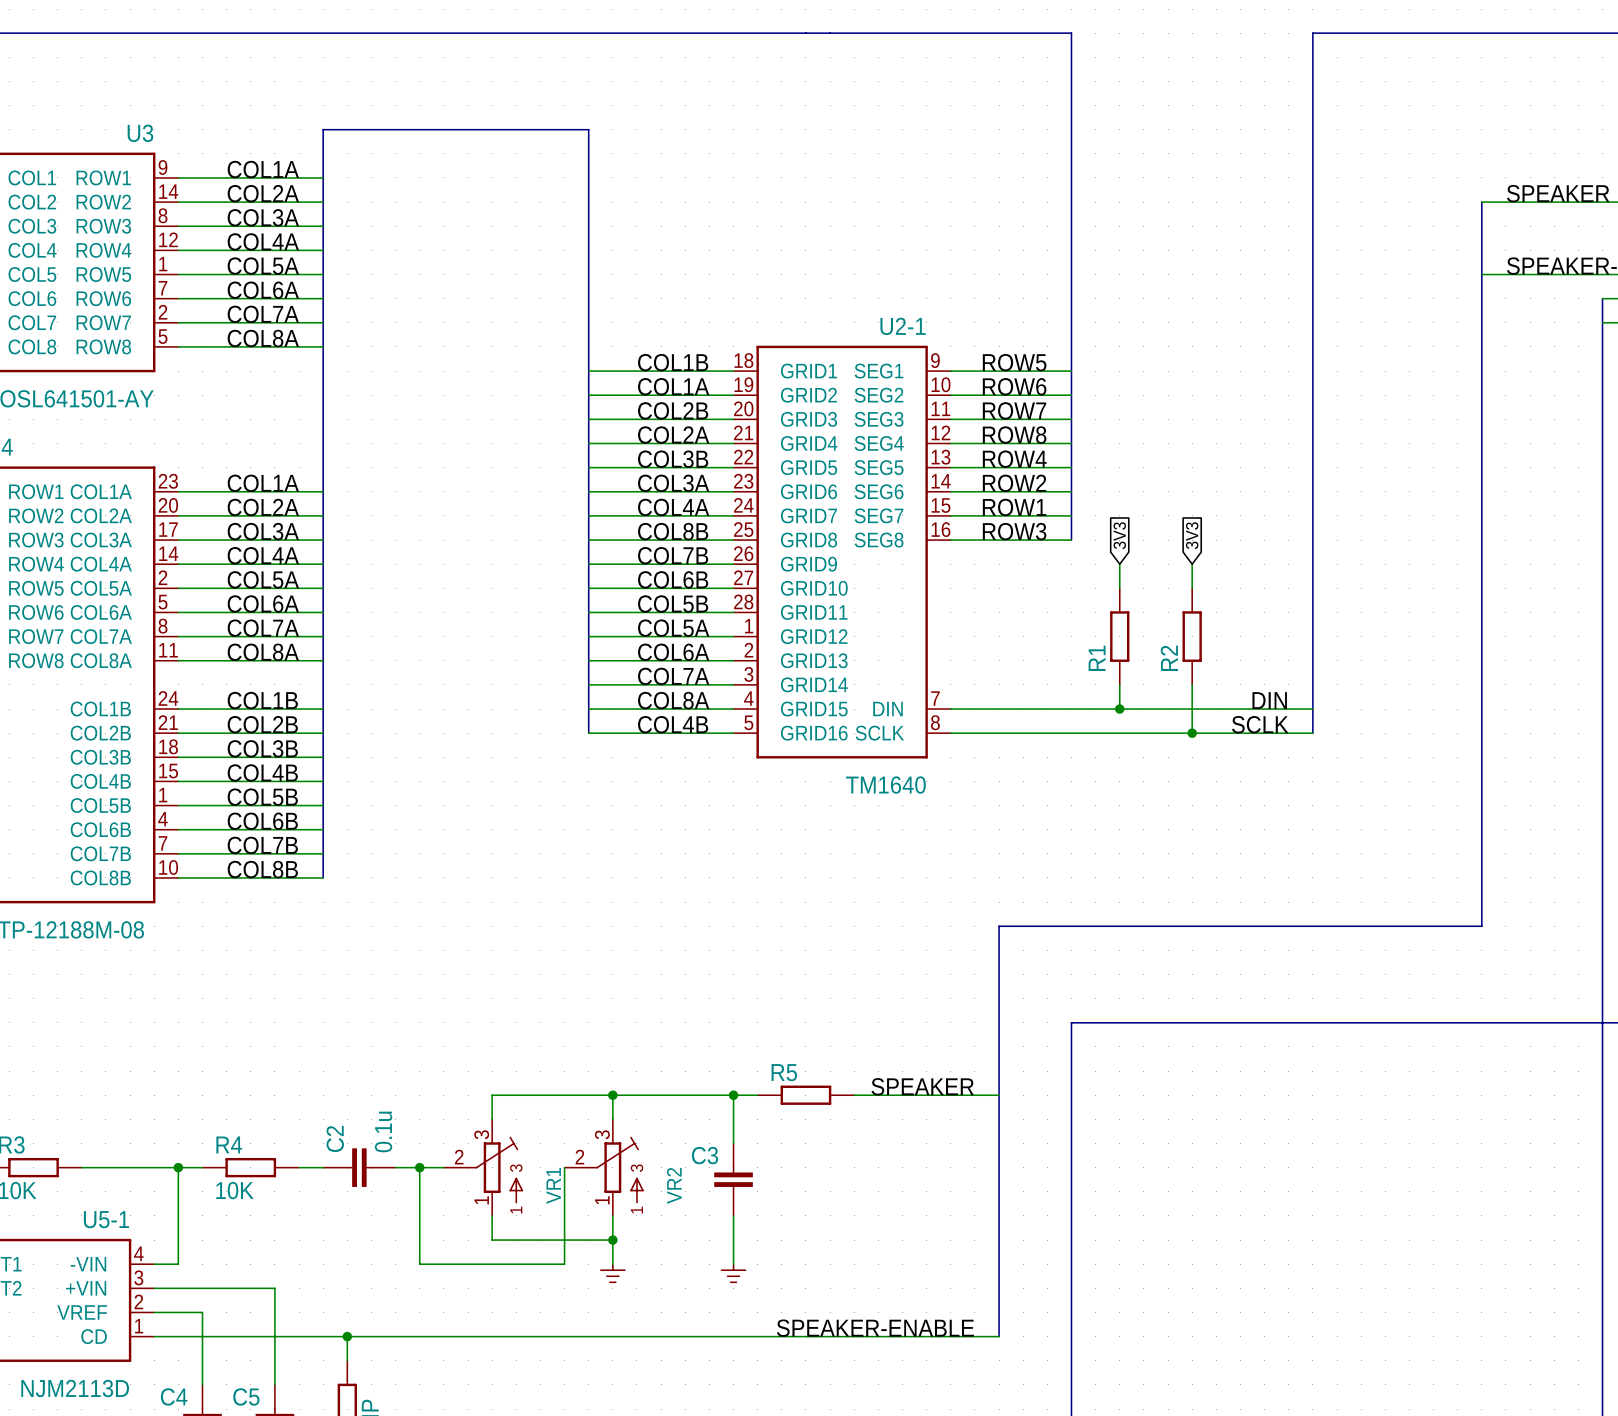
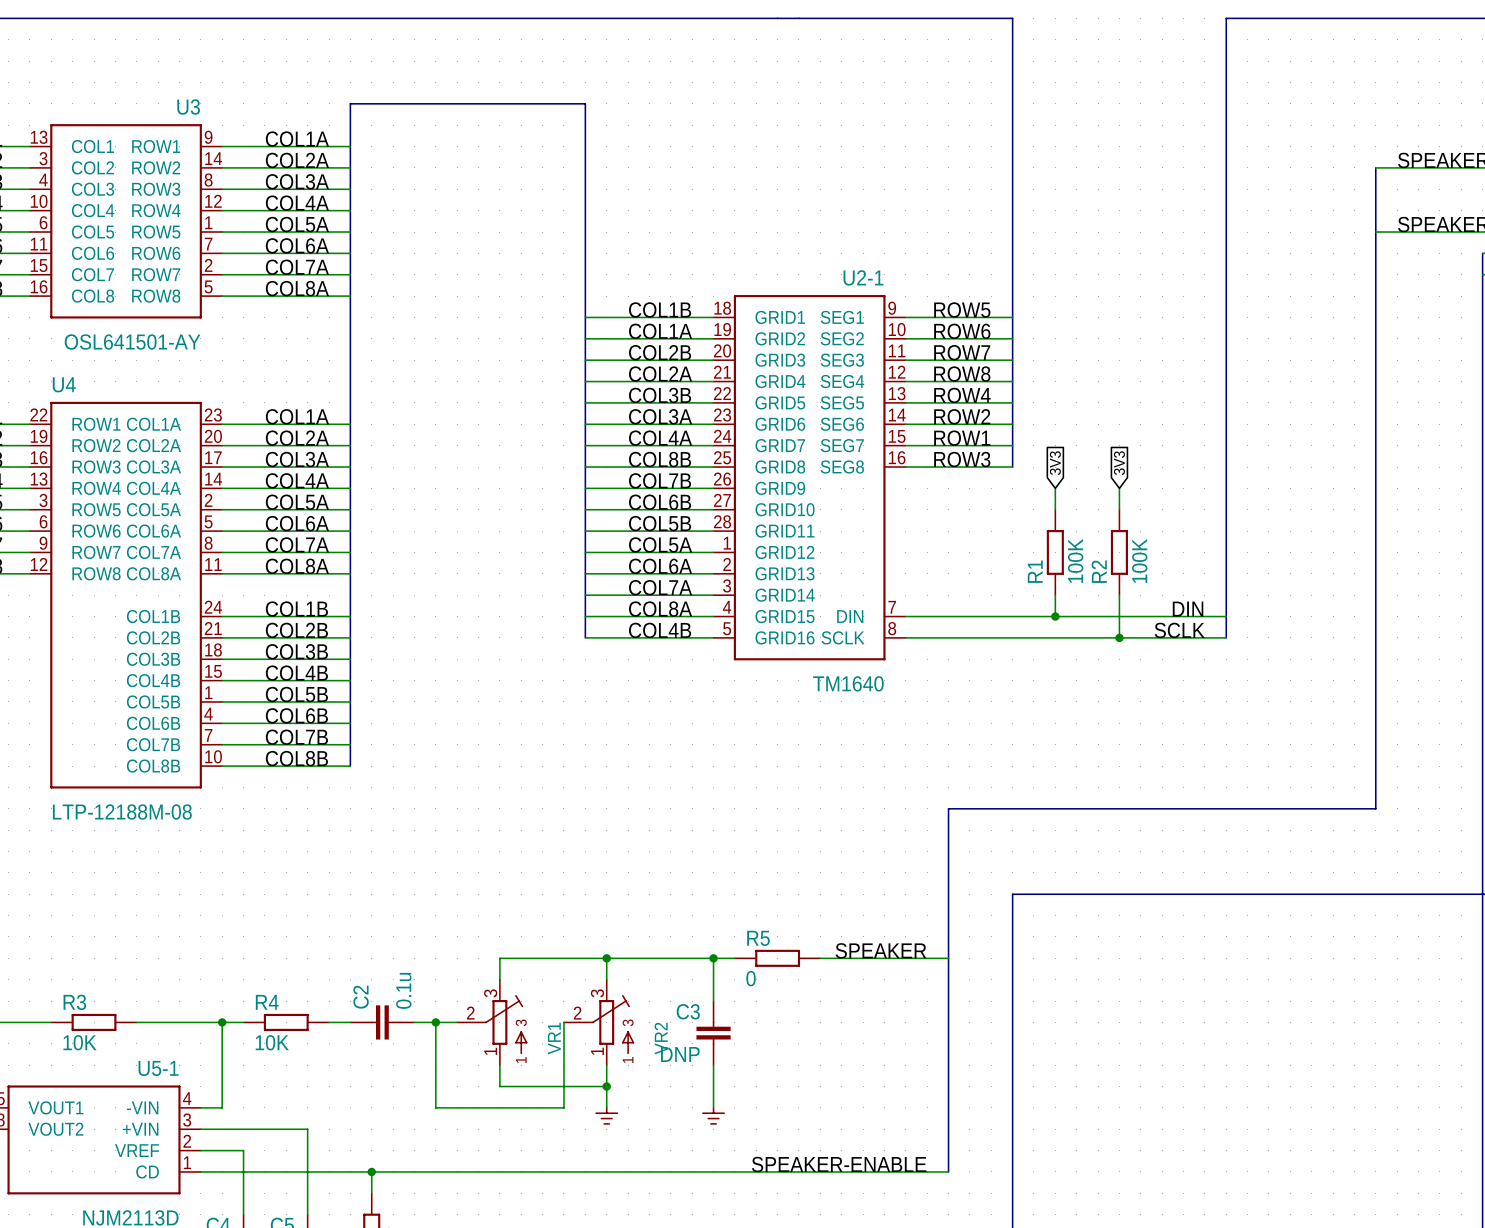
R1 value: none -> 100K (1075, 561)
R2 value: none -> 100K (1139, 561)
R5 value: none -> 0 (751, 978)
C3 value: none -> DNP (680, 1054)

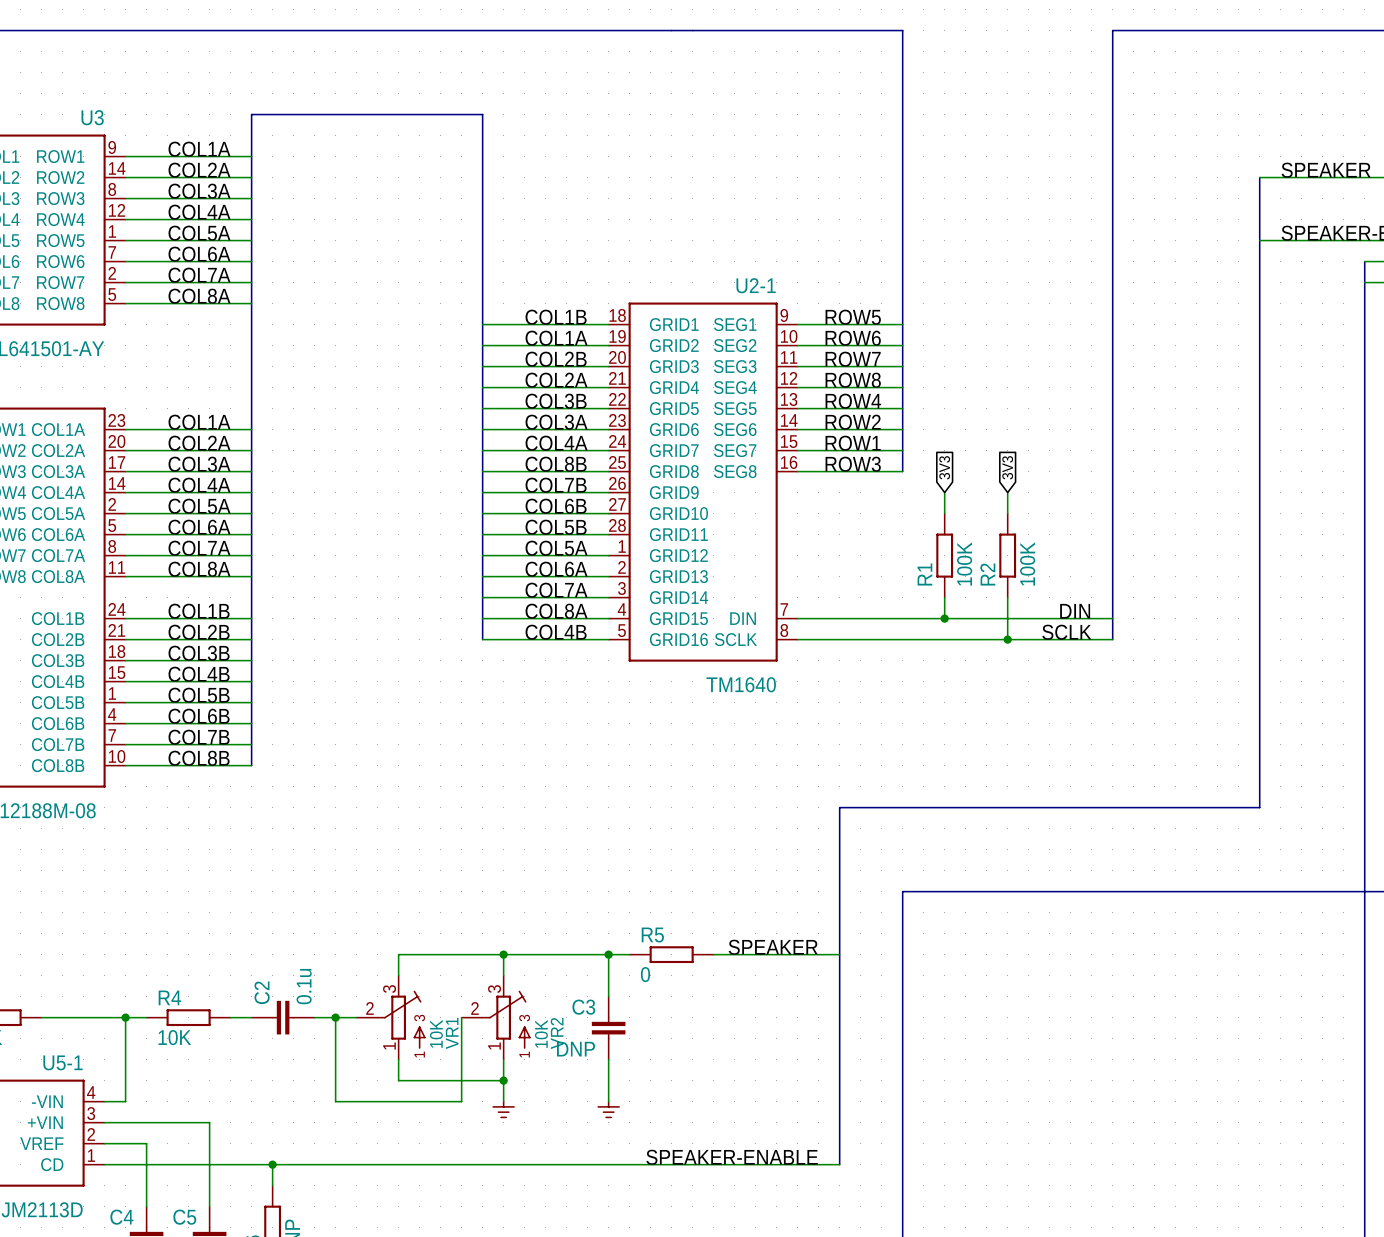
VR1 value: none -> 10K (436, 1033)
VR2 value: none -> 10K (541, 1033)

